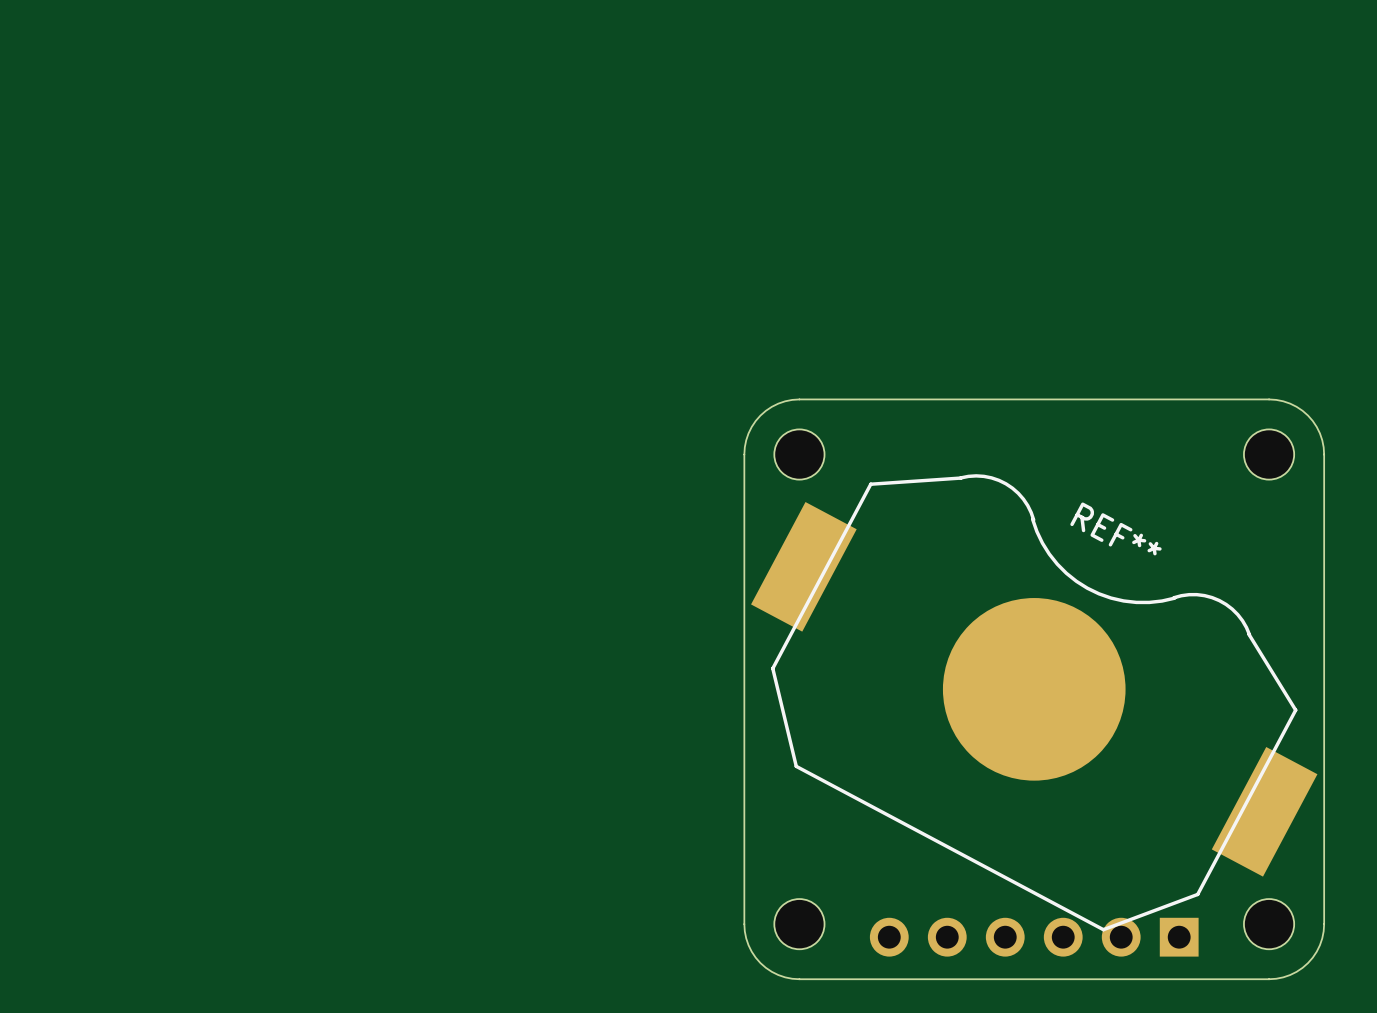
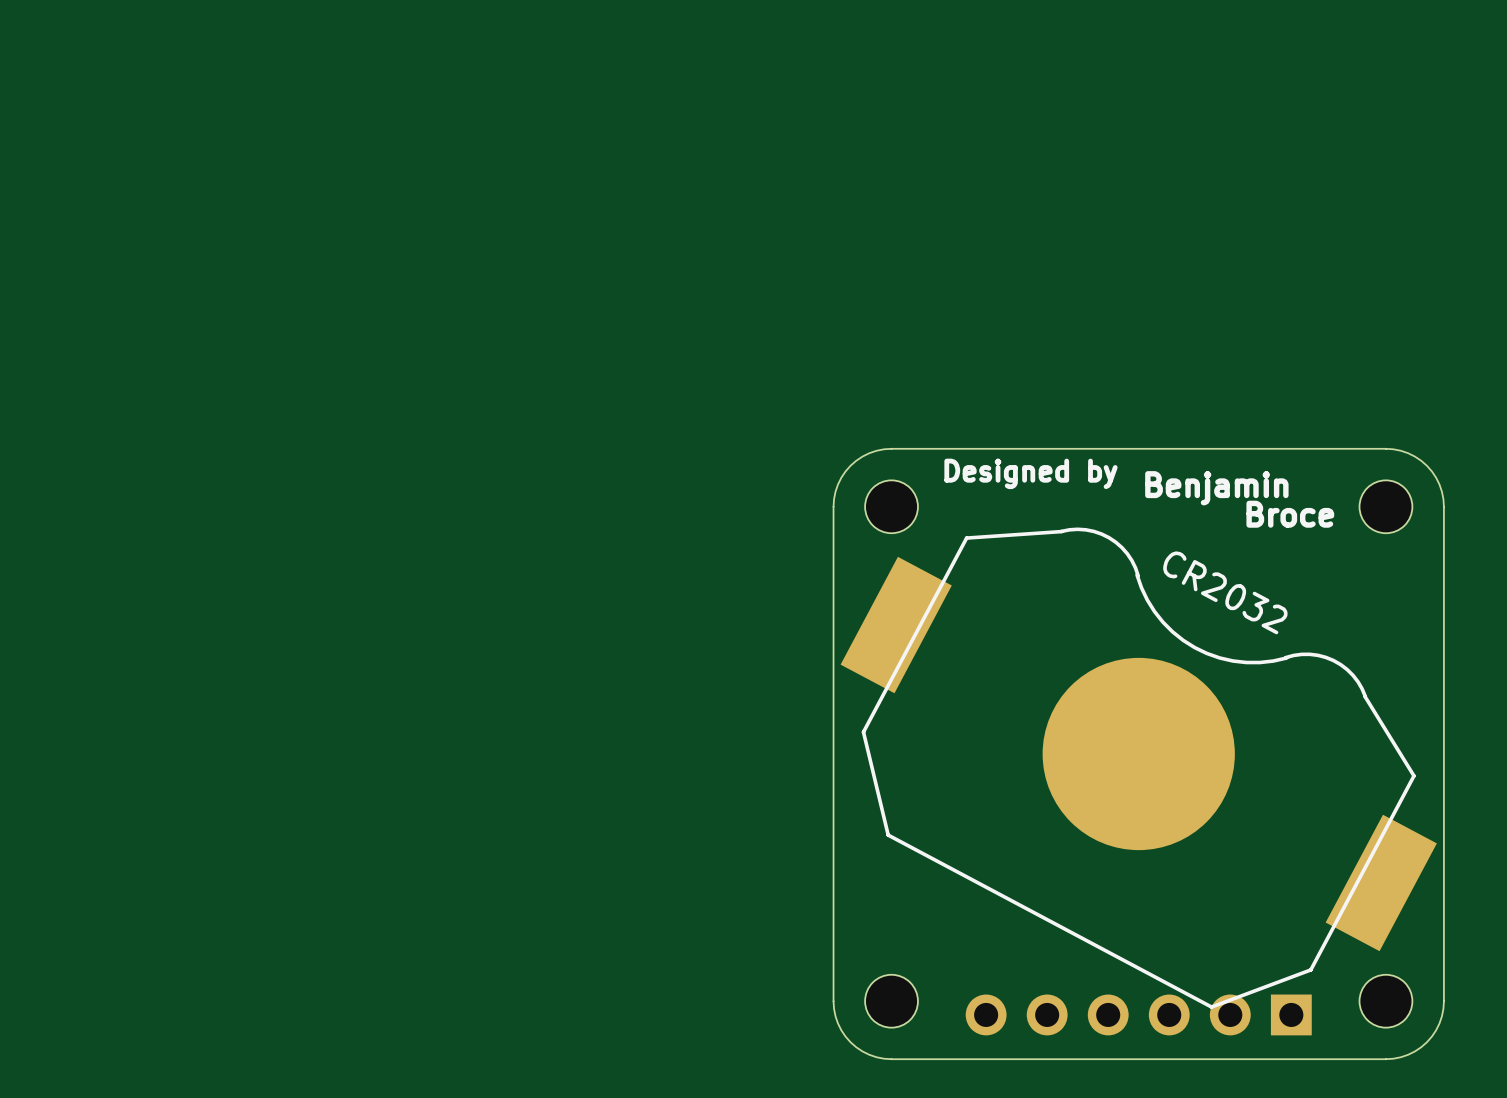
text: none -> Designed by (1031, 473)
text: none -> Benjamin (1216, 488)
text: none -> Broce (1290, 514)
part text: REF** (1115, 528) -> CR2032 (1225, 592)

